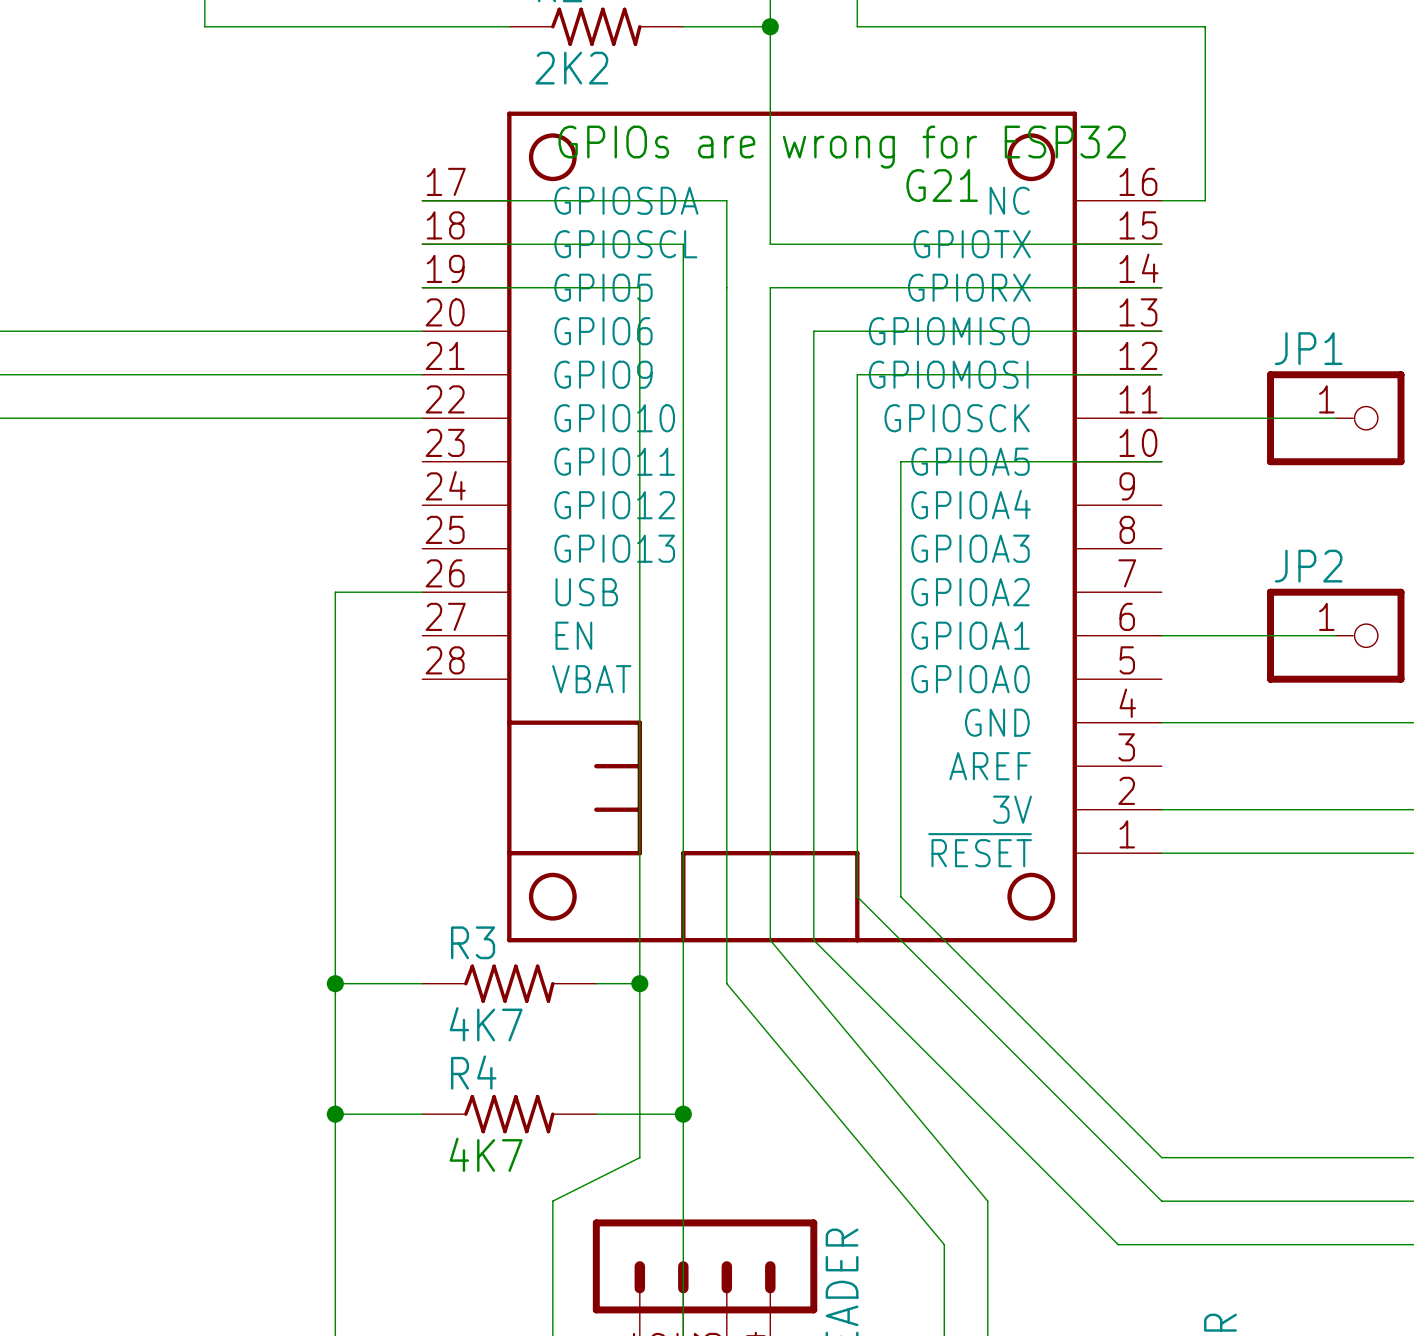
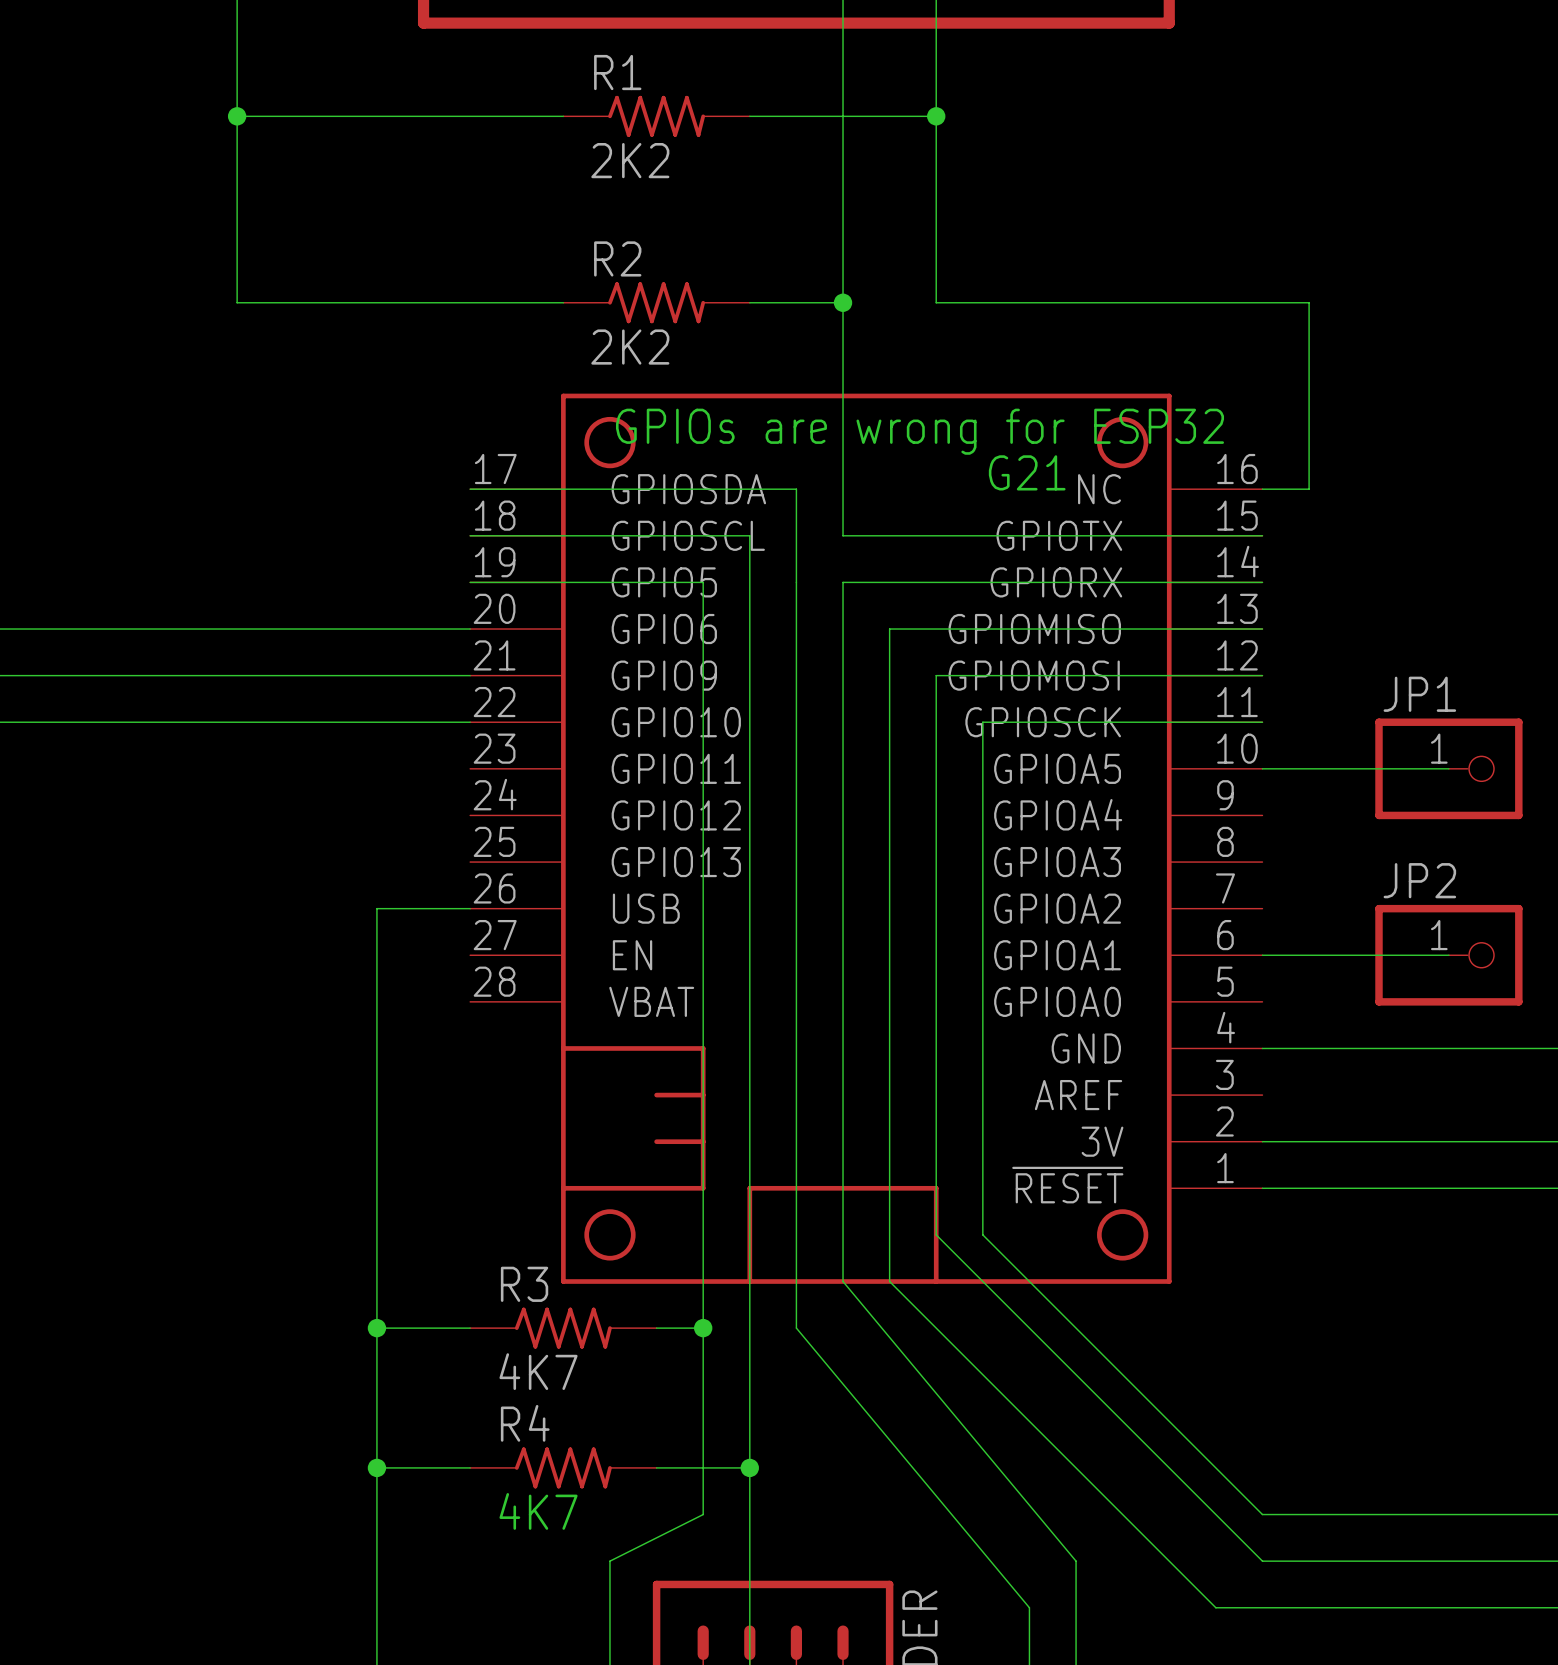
wire: (1161, 418) (1335, 418) -> (1262, 768) (1448, 768)
JP1 position: (1335, 418) -> (1448, 768)
wire: (900, 461) (1161, 461) -> (982, 768) (982, 722) (1262, 722)

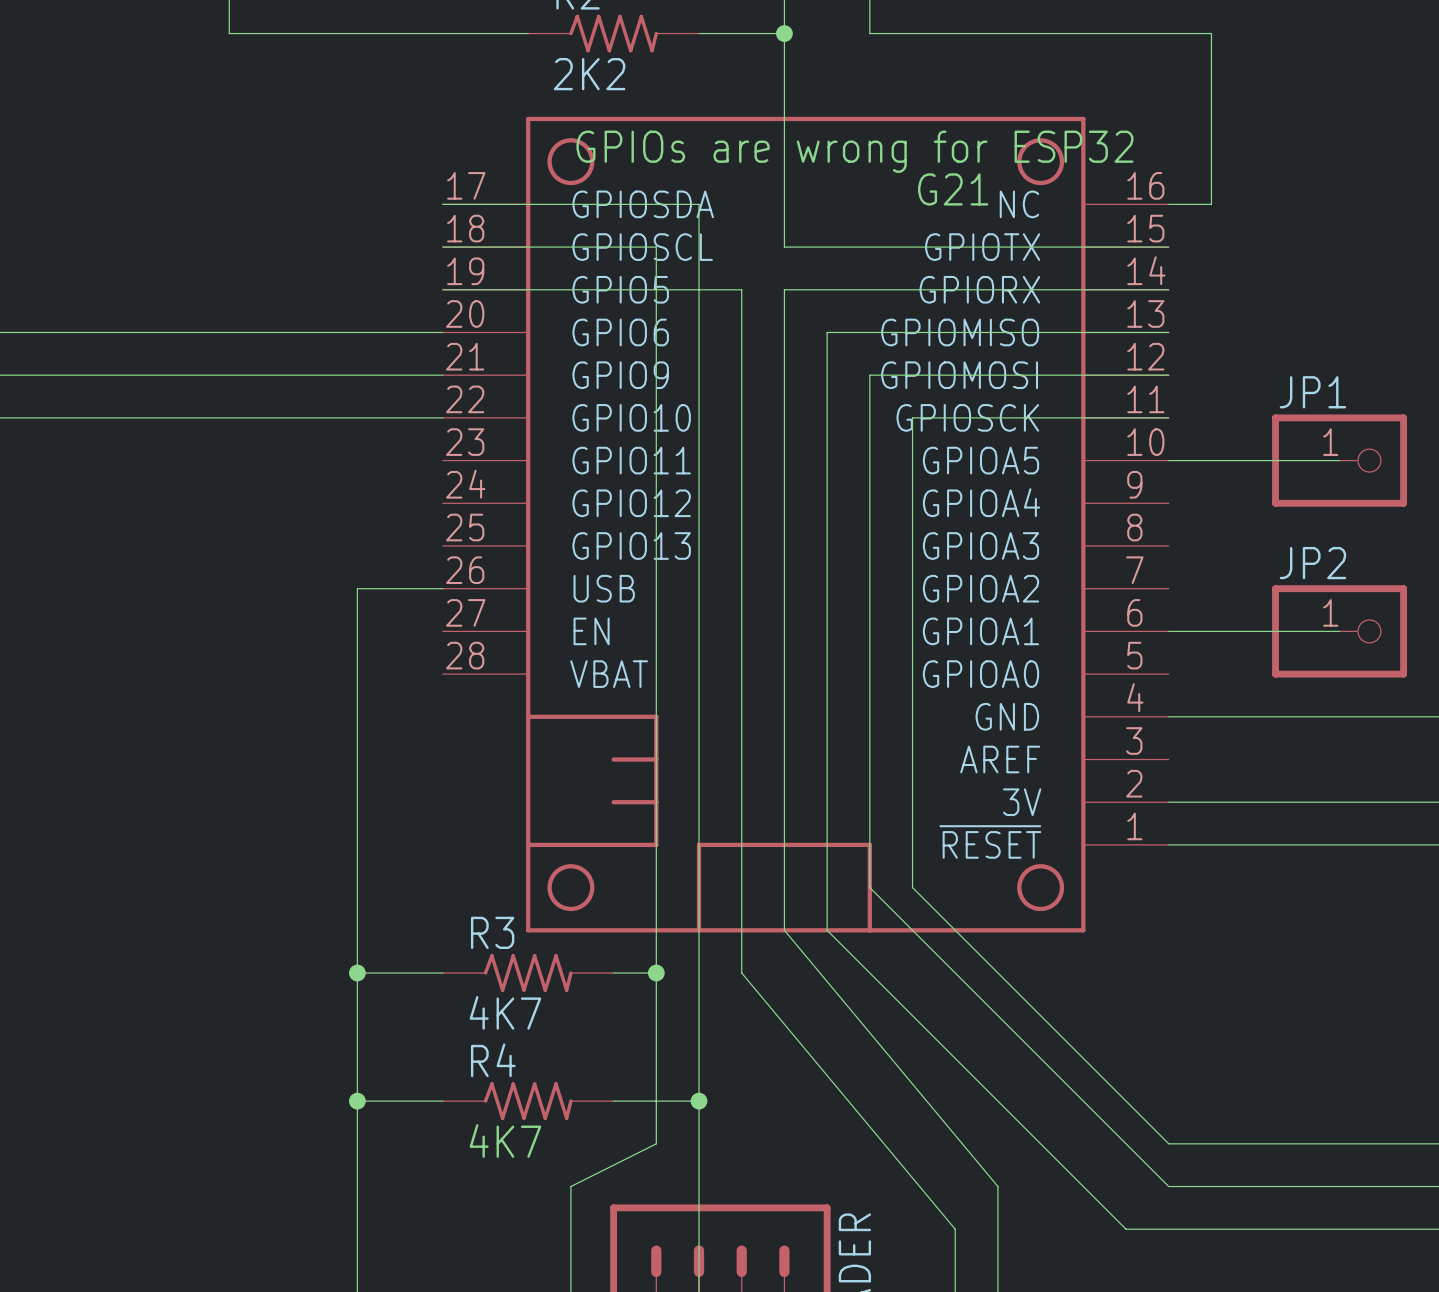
wire: (749, 489) (796, 489) (796, 582) -> (699, 204) (699, 247)
wire: (703, 535) (749, 535) -> (656, 247) (656, 289) (741, 289)

